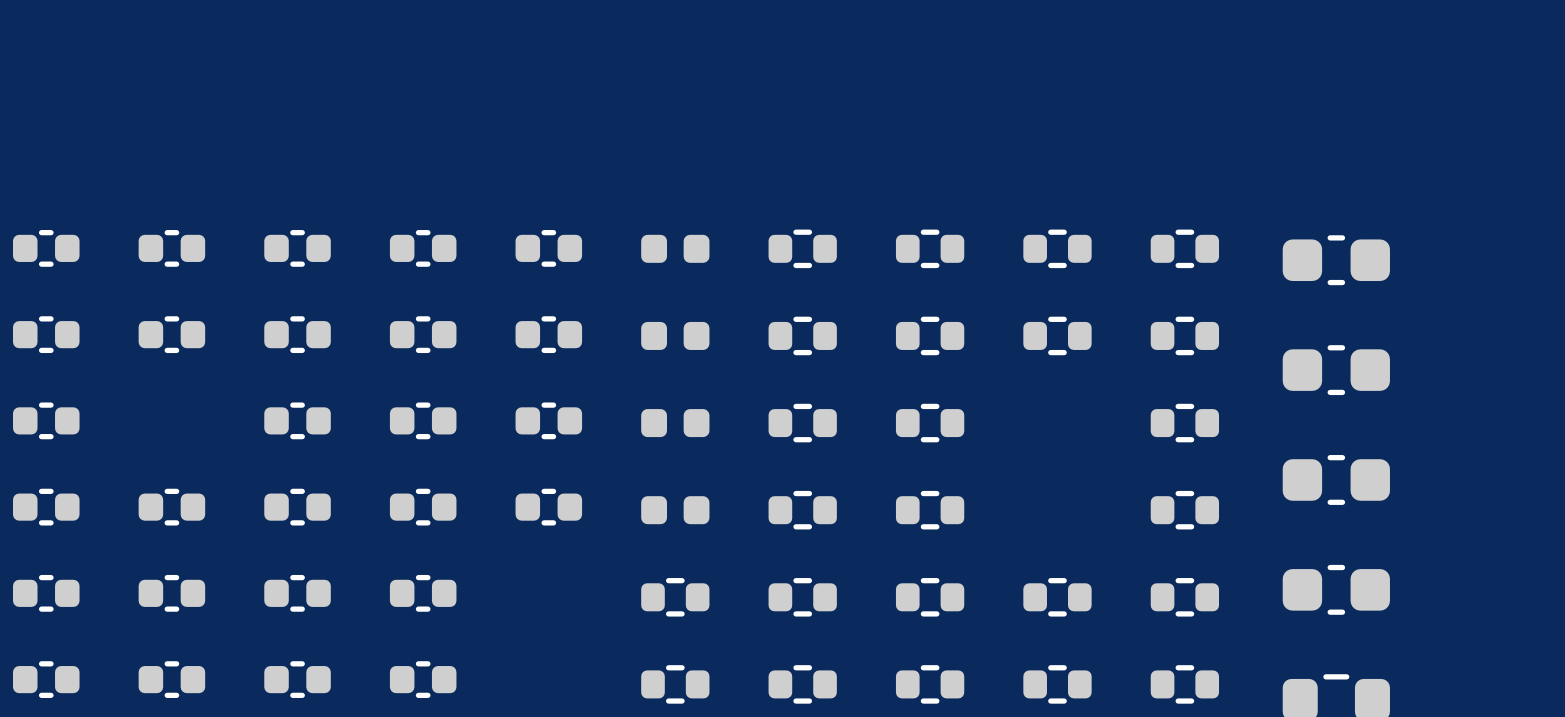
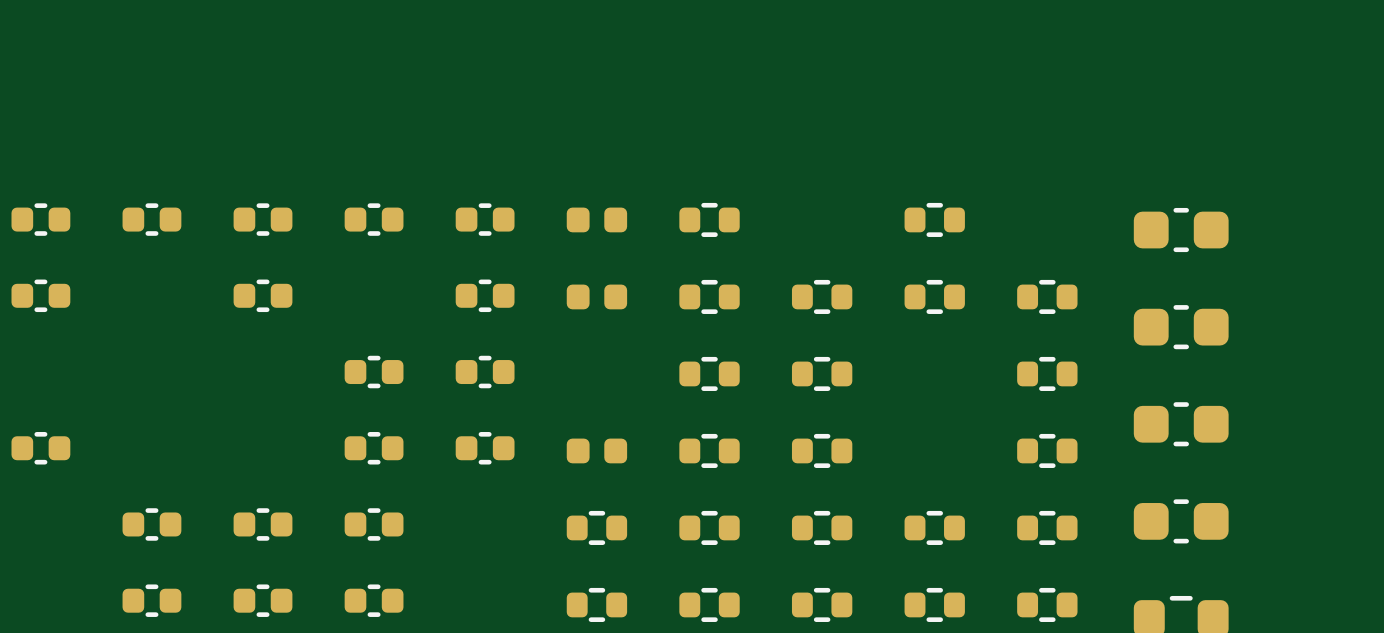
part: (930, 248) -> none
part: (1184, 248) -> none
part: (171, 334) -> none
part: (423, 334) -> none
part: (46, 420) -> none
part: (297, 420) -> none
part: (675, 423) -> none
part: (171, 507) -> none
part: (297, 507) -> none
part: (46, 593) -> none
part: (46, 679) -> none

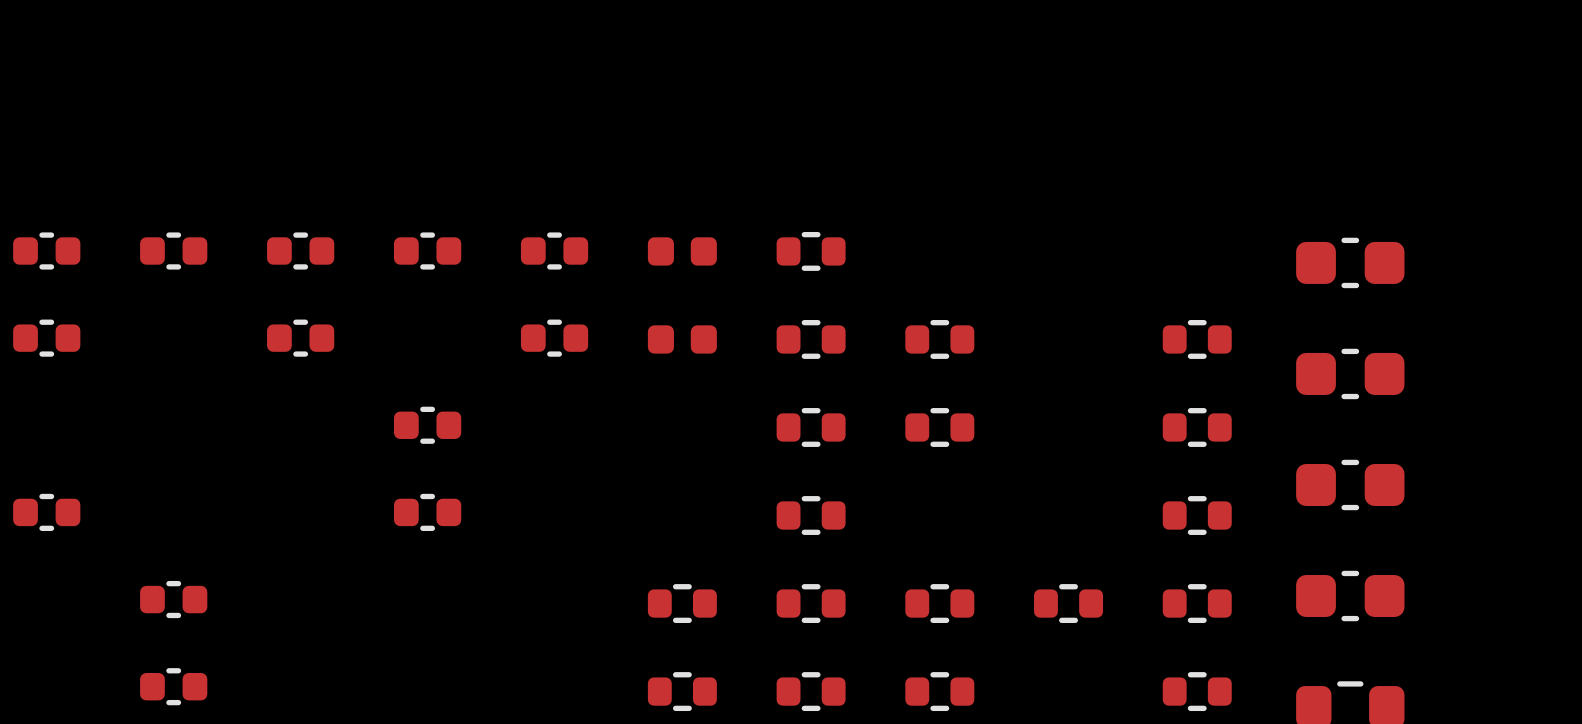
part: (934, 219) -> none
part: (934, 296) -> none
part: (485, 372) -> none
part: (485, 448) -> none
part: (596, 450) -> none
part: (822, 450) -> none
part: (263, 524) -> none
part: (374, 524) -> none
part: (263, 600) -> none
part: (374, 600) -> none
part: (934, 604) -> none

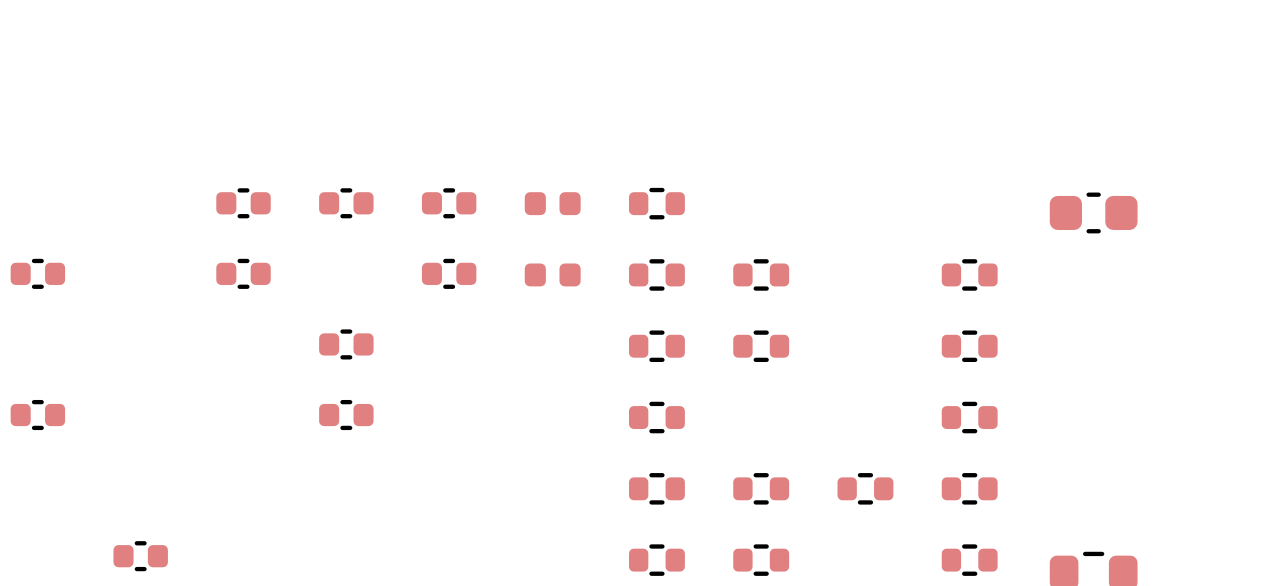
part: (46, 251) -> none
part: (173, 251) -> none
part: (1350, 373) -> none
part: (1350, 484) -> none
part: (1350, 596) -> none
part: (173, 599) -> none
part: (682, 603) -> none
part: (682, 691) -> none

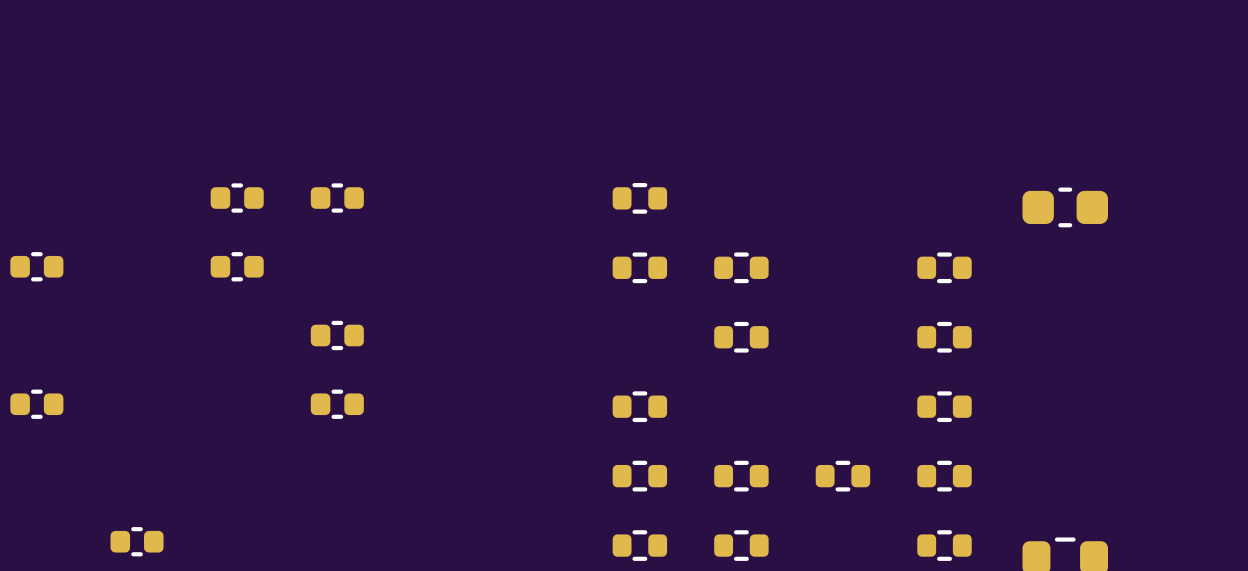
part: (449, 203) -> none
part: (552, 203) -> none
part: (449, 273) -> none
part: (552, 274) -> none
part: (656, 346) -> none

